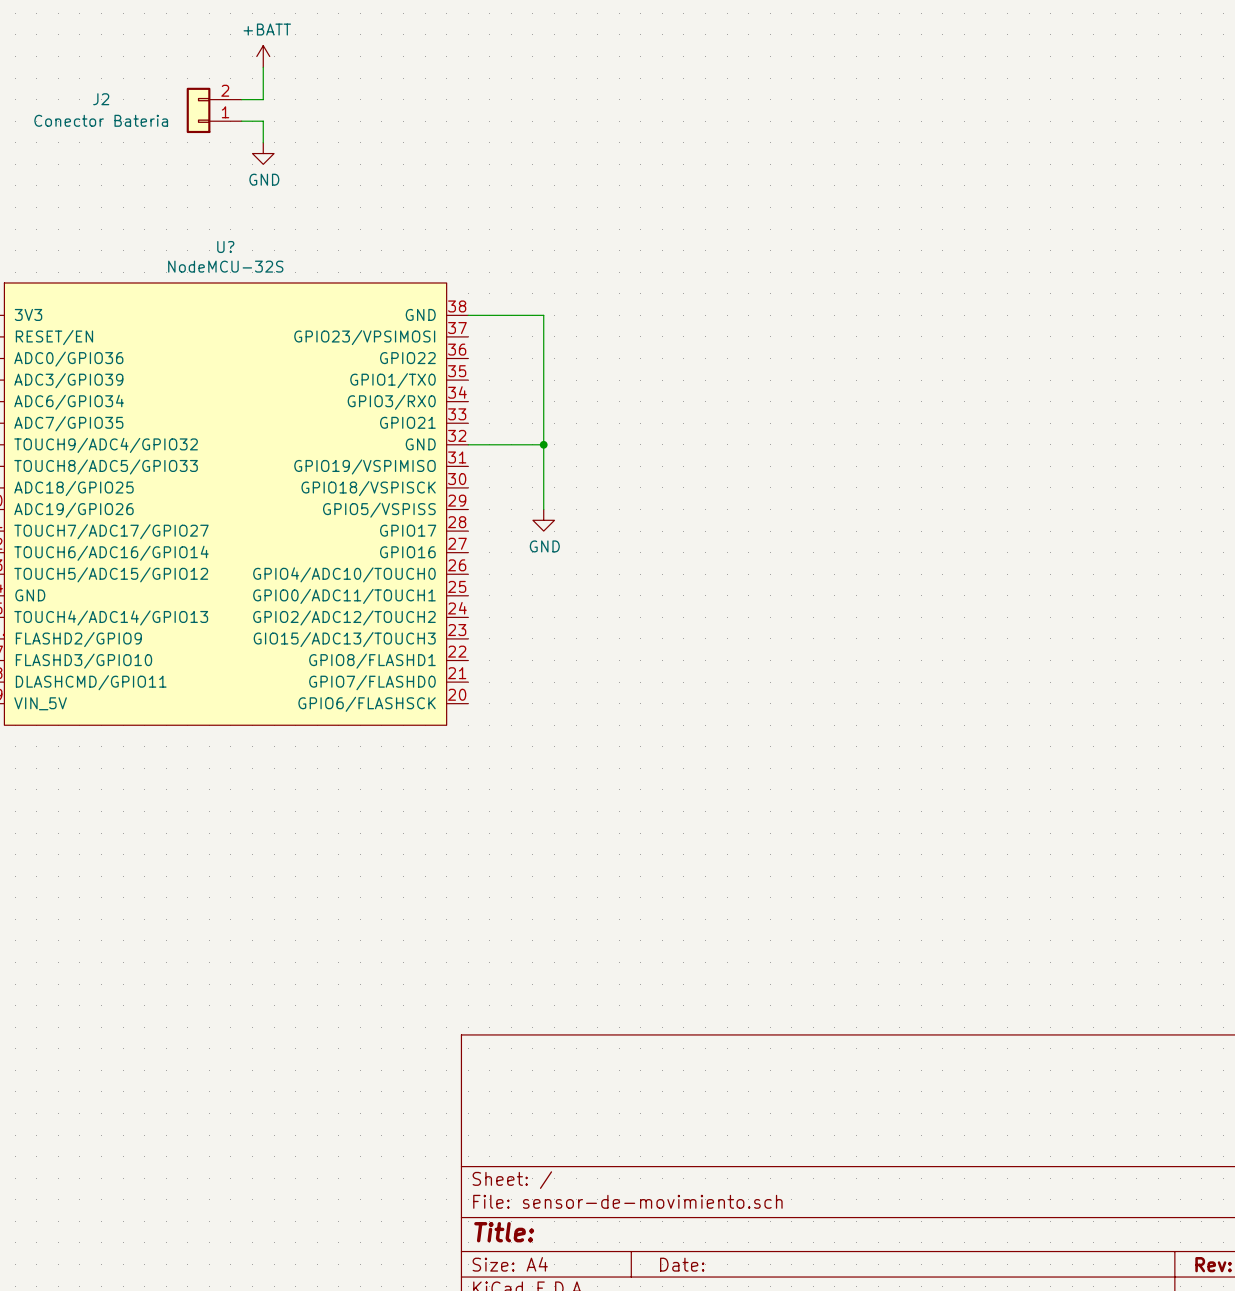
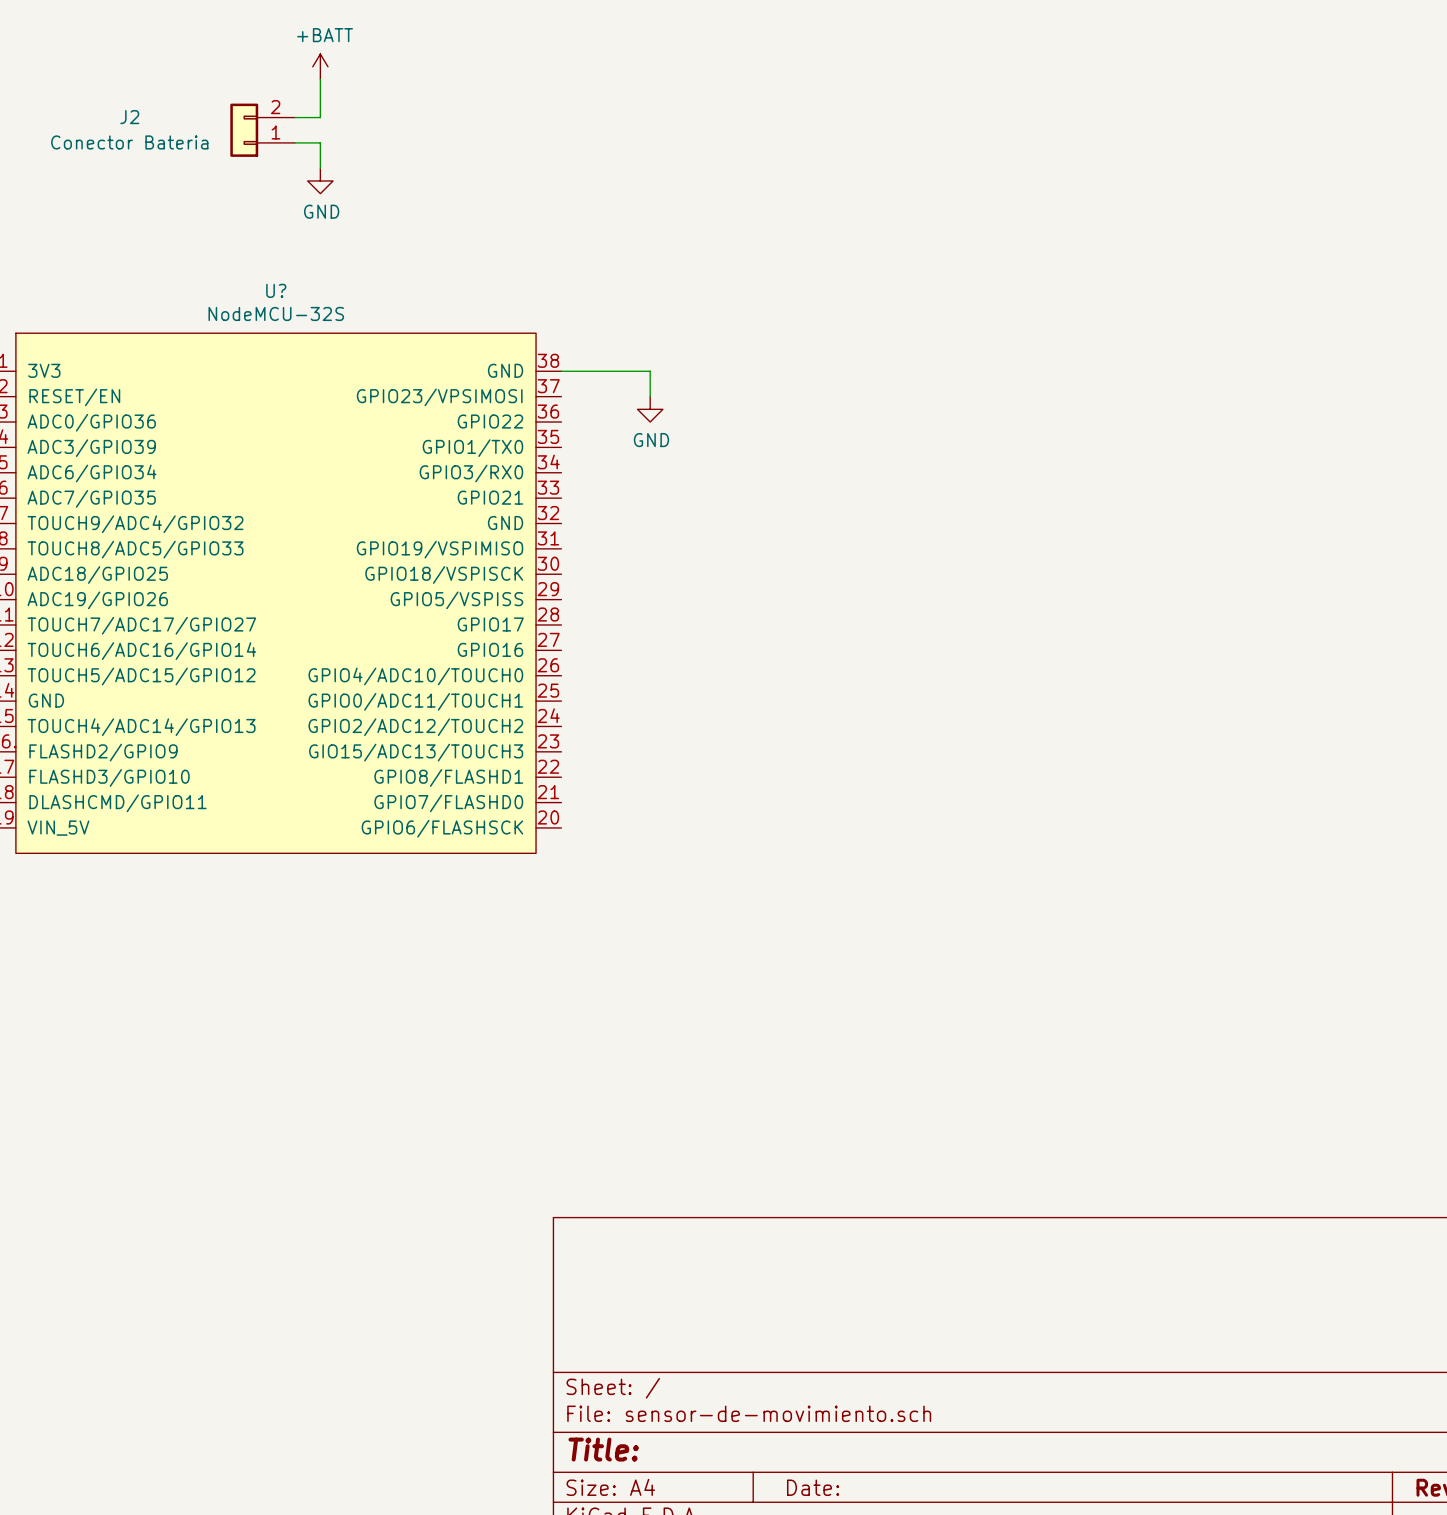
wire: (543, 336) (543, 509) -> none
wire: (468, 444) (543, 444) -> none
junction: (543, 444) -> none
power symbol position: GND (543, 520) -> GND (650, 409)

